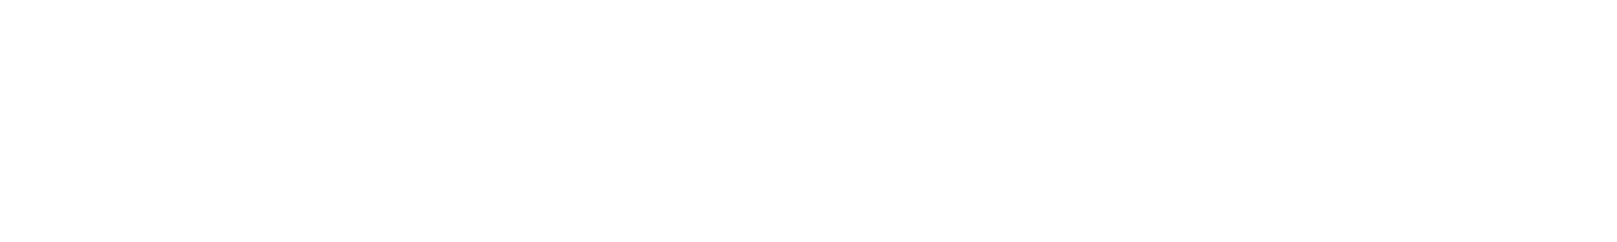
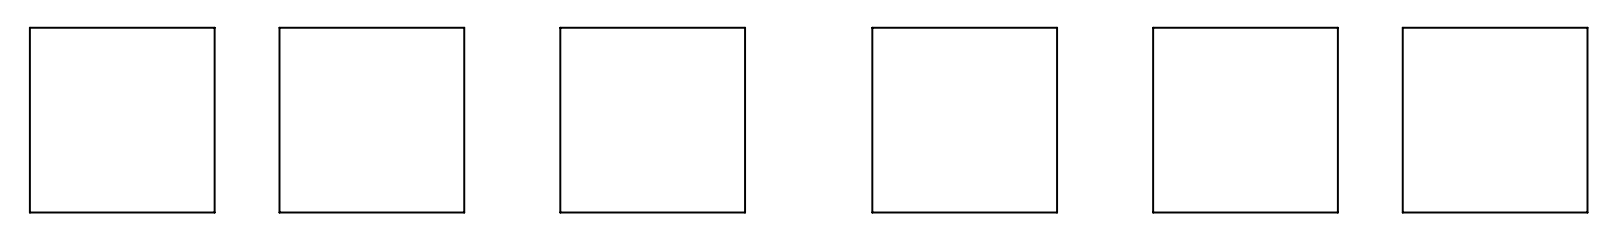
drawing: none -> [28, 26, 216, 214]
drawing: none -> [278, 26, 466, 214]
drawing: none -> [559, 26, 747, 214]
drawing: none -> [871, 26, 1059, 214]
drawing: none -> [1152, 26, 1339, 214]
drawing: none -> [1401, 26, 1589, 214]

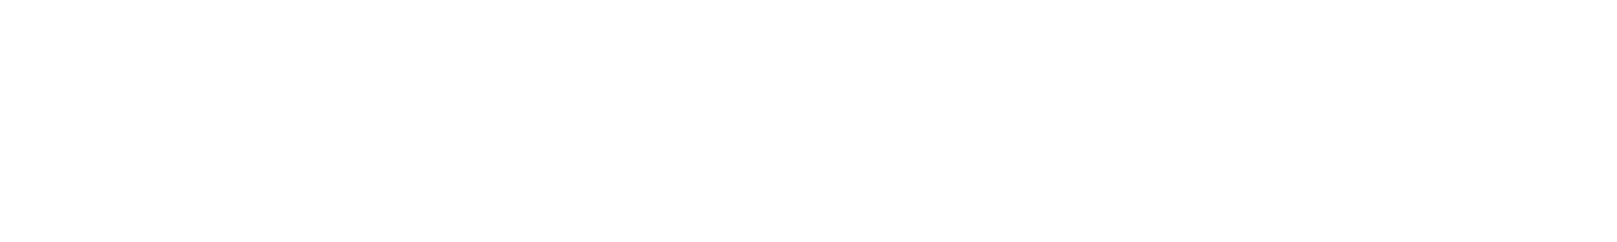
drawing: [28, 26, 216, 214] -> none
drawing: [278, 26, 466, 214] -> none
drawing: [559, 26, 747, 214] -> none
drawing: [871, 26, 1059, 214] -> none
drawing: [1152, 26, 1339, 214] -> none
drawing: [1401, 26, 1589, 214] -> none

